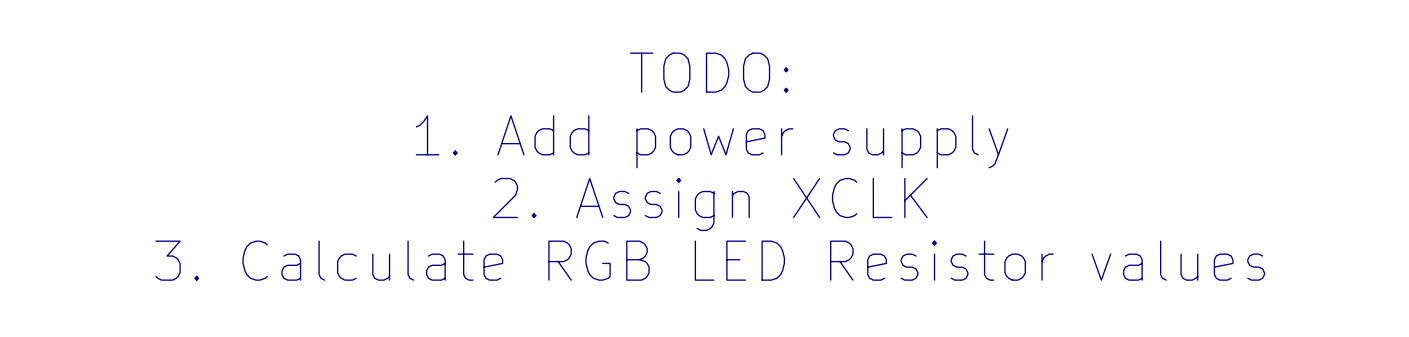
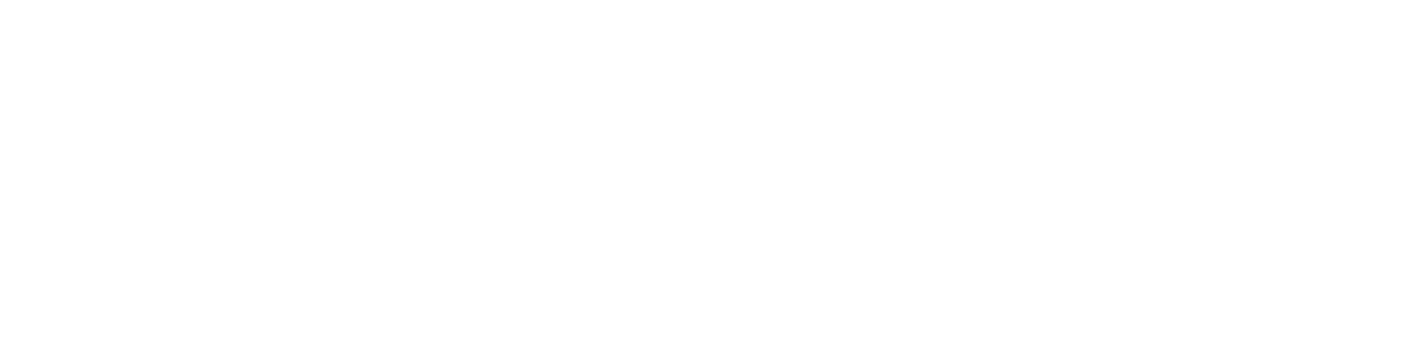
text: TODO: (709, 72) -> none
text: 1. Add power supply (712, 141) -> none
text: 2. Assign XCLK (710, 204) -> none
text: 3. Calculate RGB LED Resistor values (710, 260) -> none

